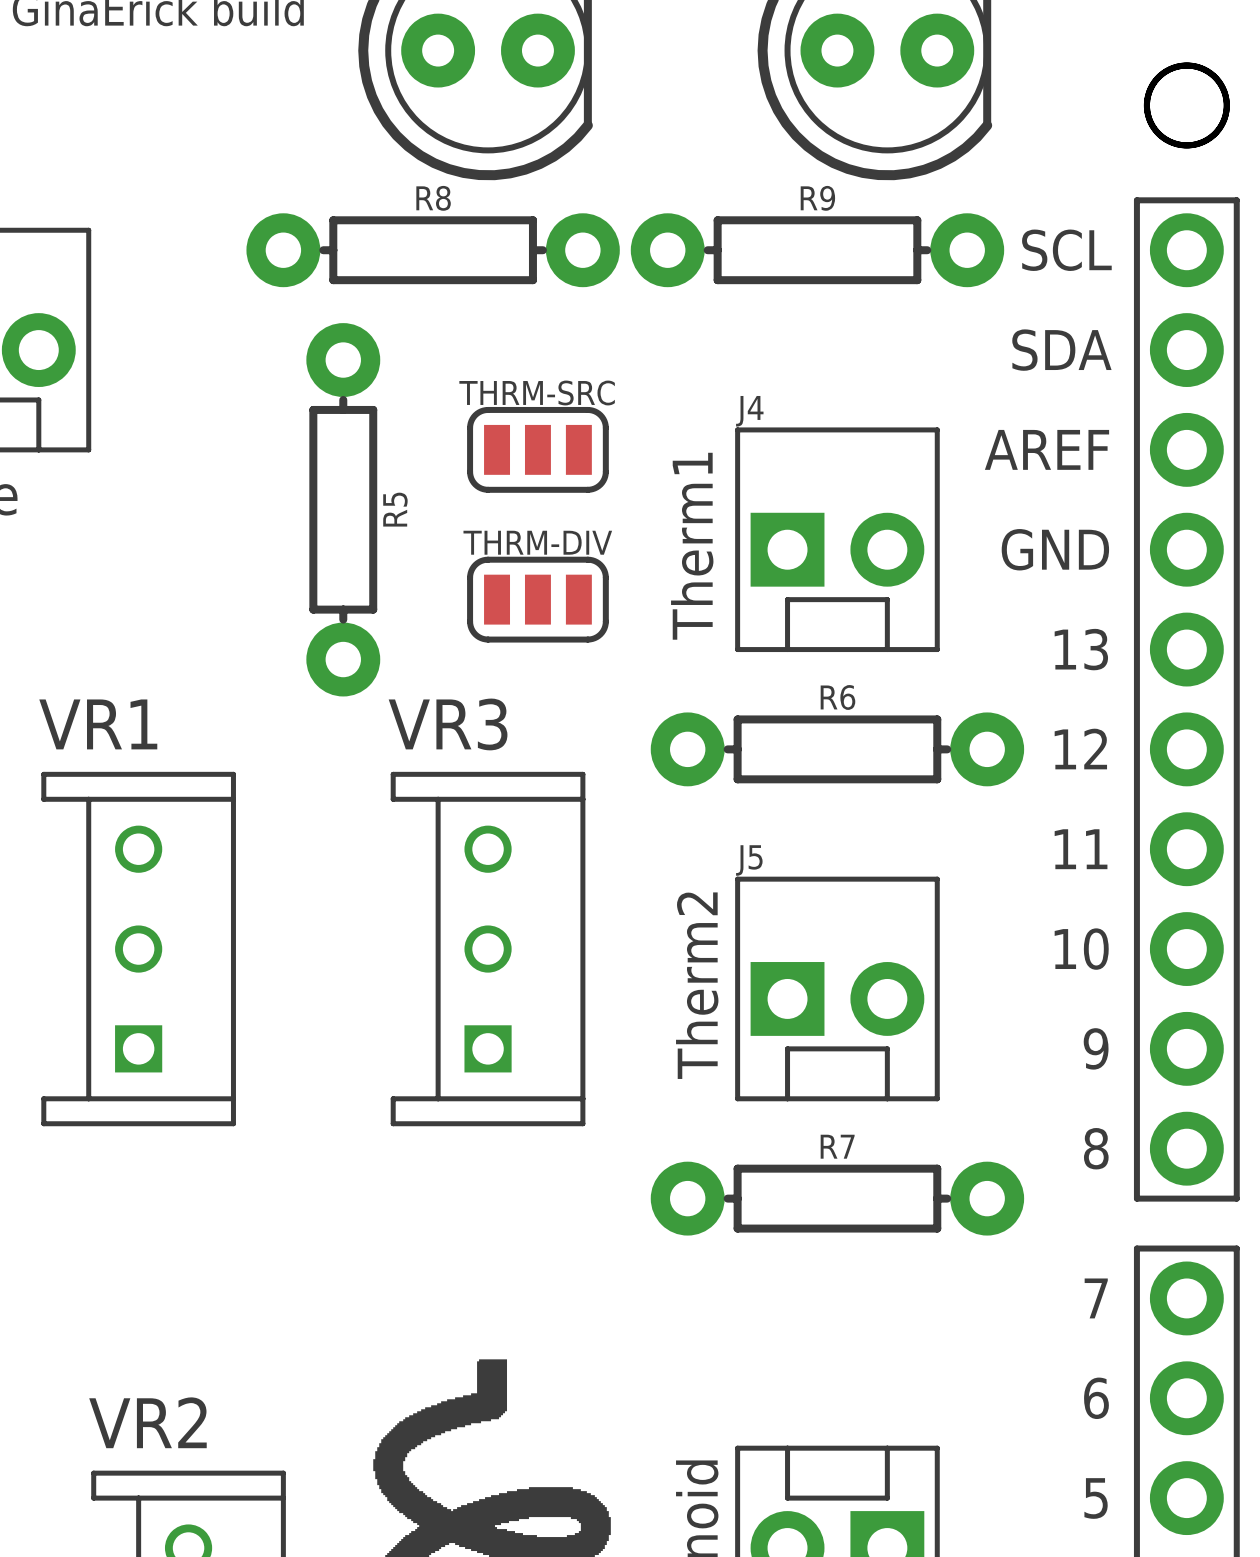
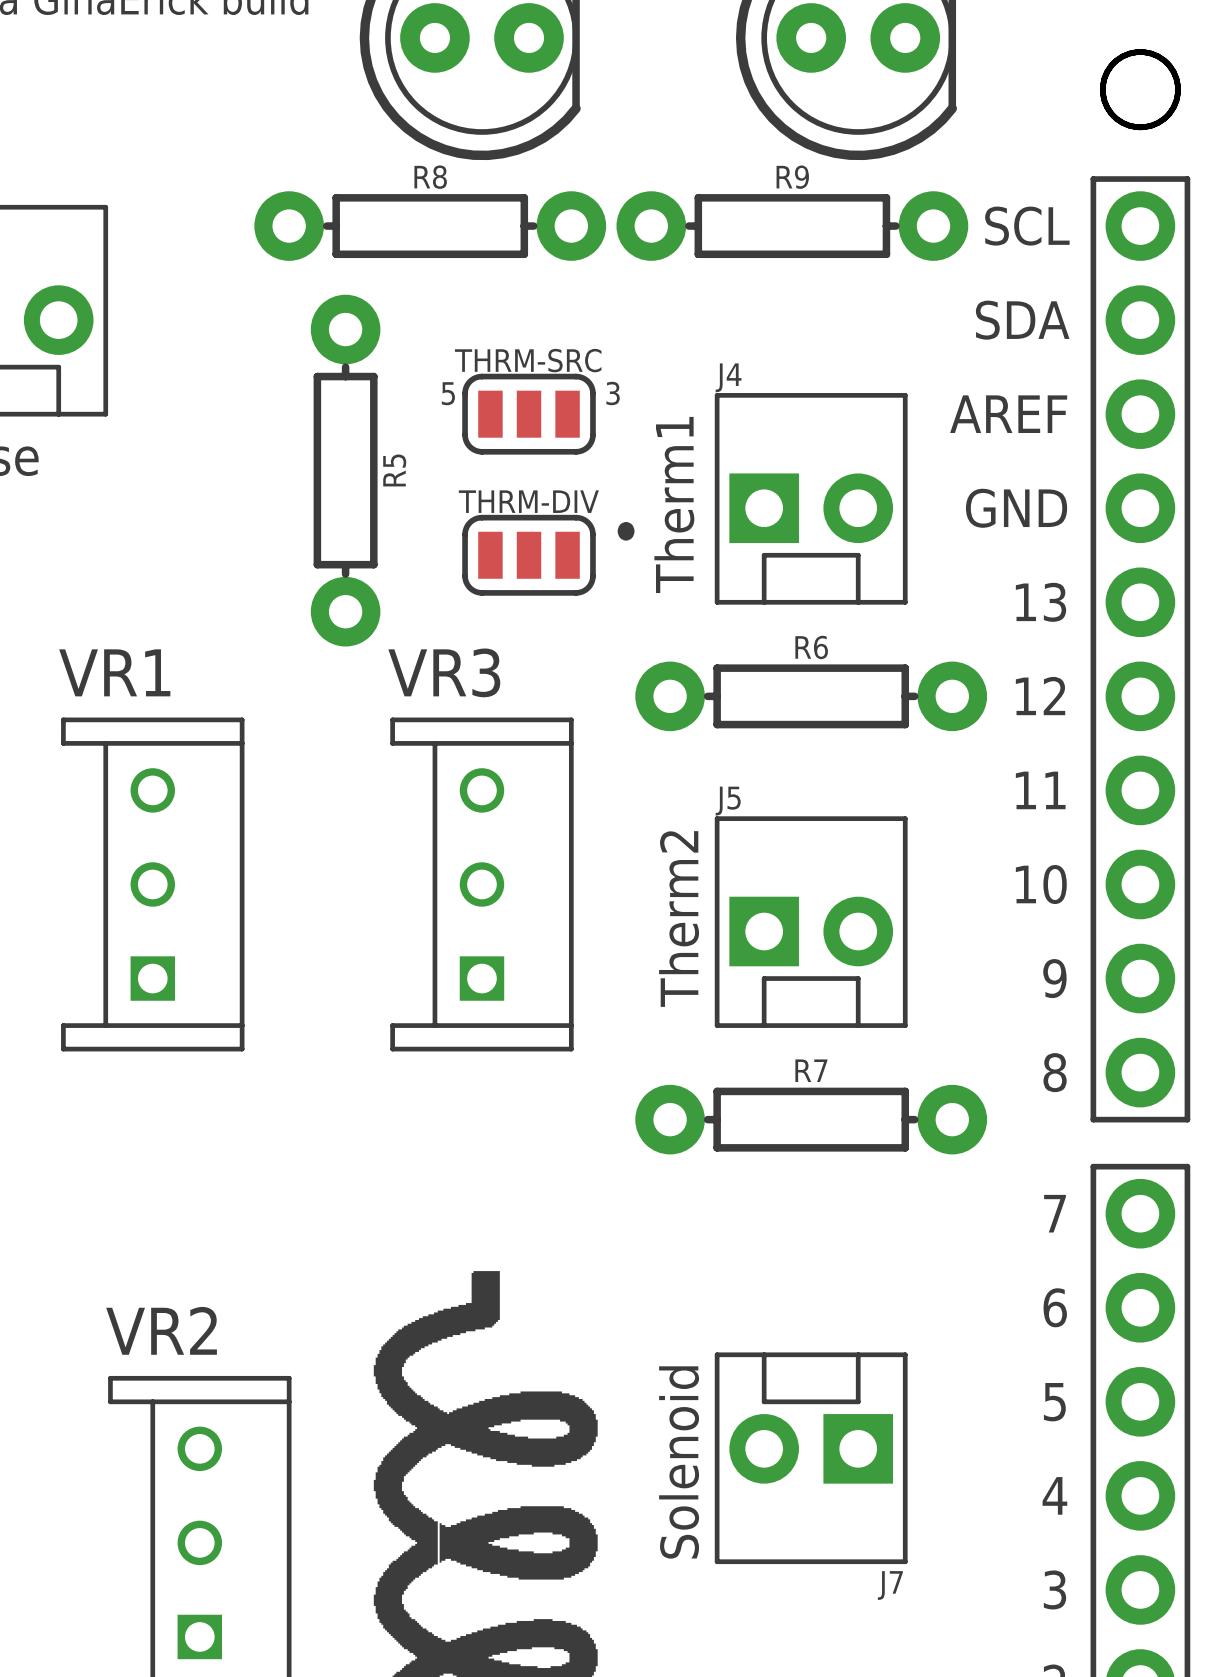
text: none -> 3 (613, 393)
text: none -> 5 (448, 393)
text: none -> • (626, 531)

